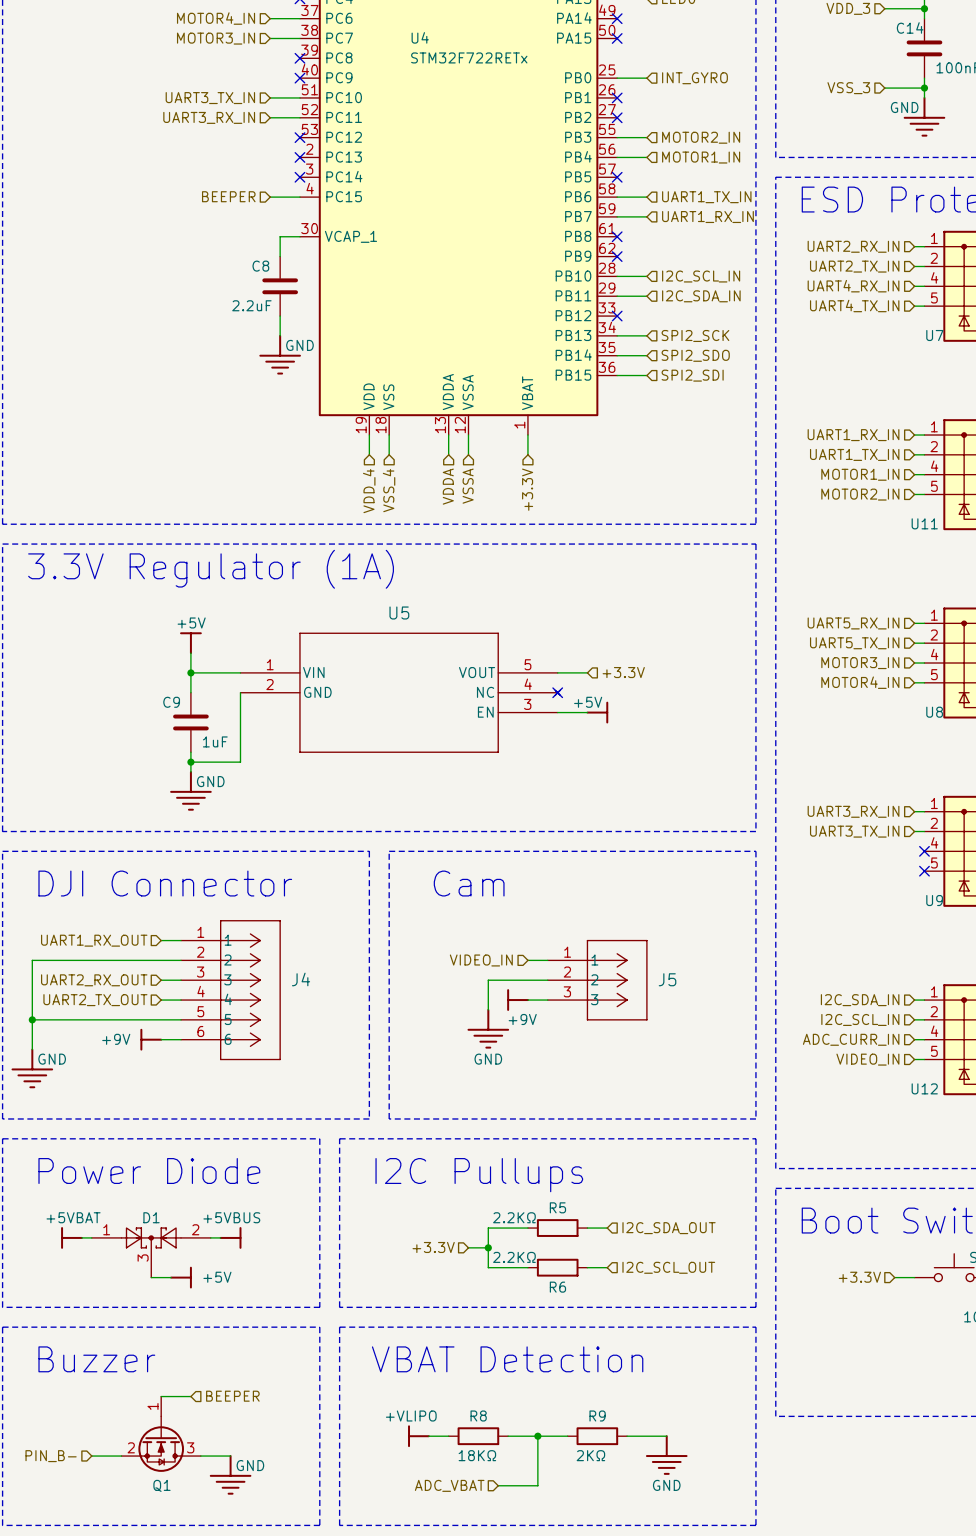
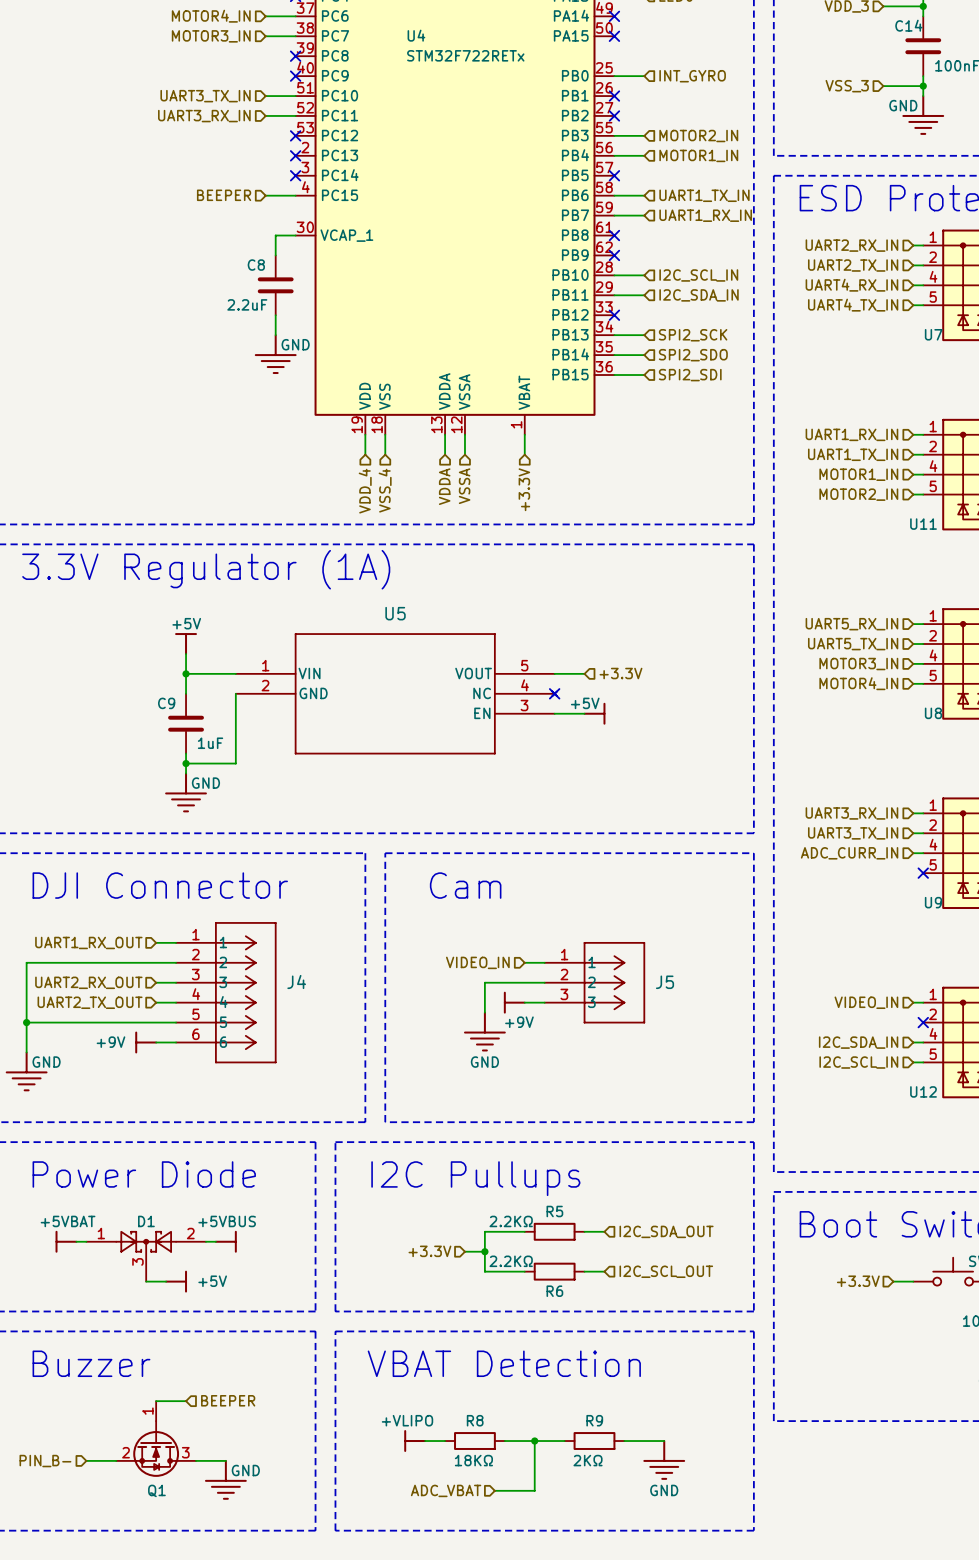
hierarchical label: none -> ADC_CURR_IN (849, 853)
no-connect mark: (924, 851) -> none
hierarchical label: I2C_SDA_IN (860, 1000) -> VIDEO_IN (866, 1002)
hierarchical label: I2C_SCL_IN (860, 1019) -> none
wire: (914, 1019) (924, 1019) -> (913, 853) (923, 853)
no-connect mark: none -> (923, 1022)
hierarchical label: ADC_CURR_IN (851, 1039) -> I2C_SDA_IN (858, 1042)
hierarchical label: VIDEO_IN (867, 1059) -> I2C_SCL_IN (858, 1062)

